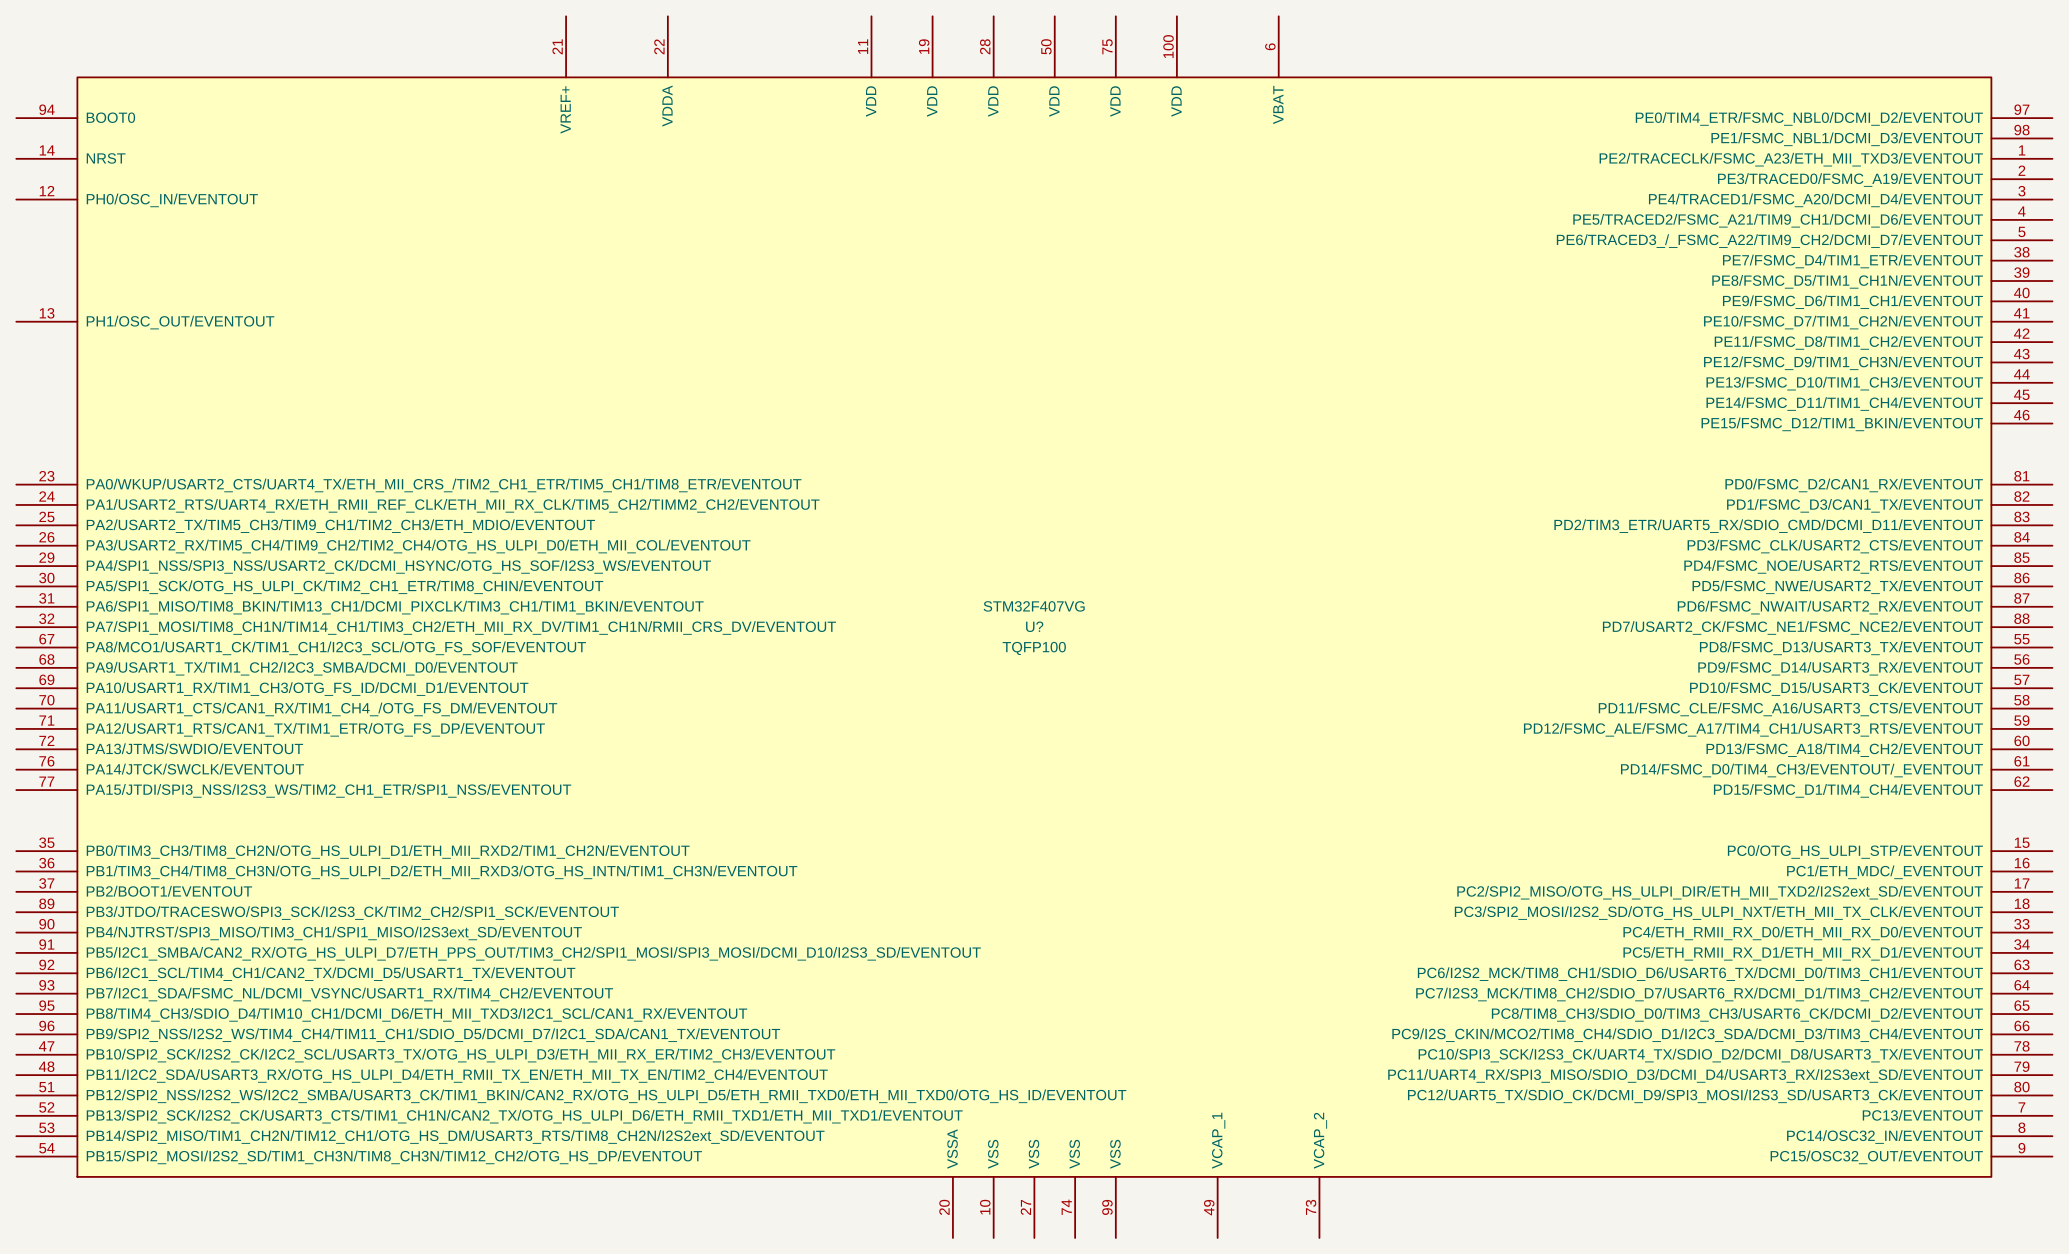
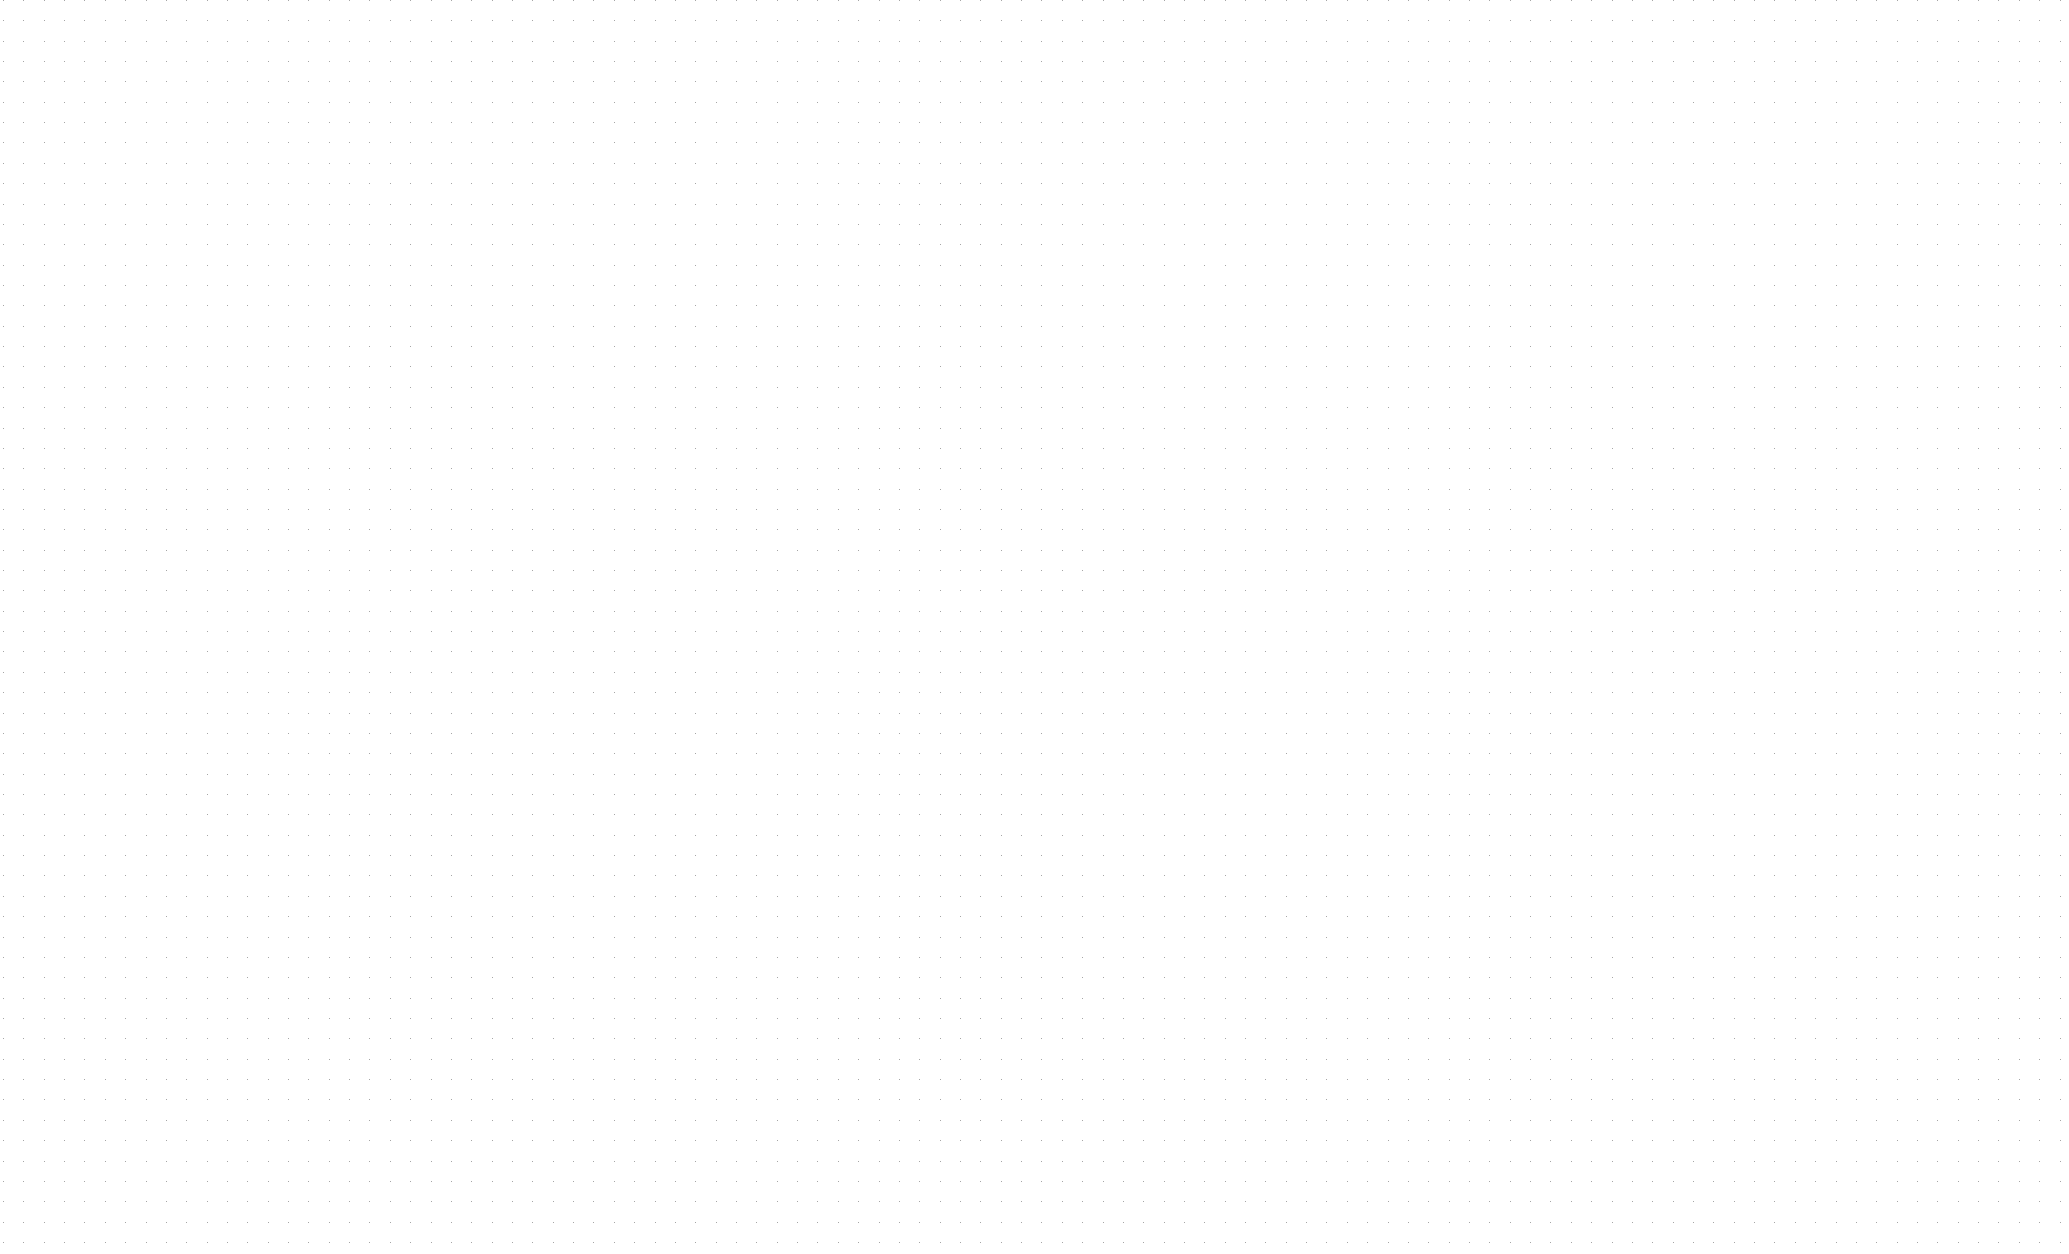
U?: STM32F407VG (1034, 627) -> none

